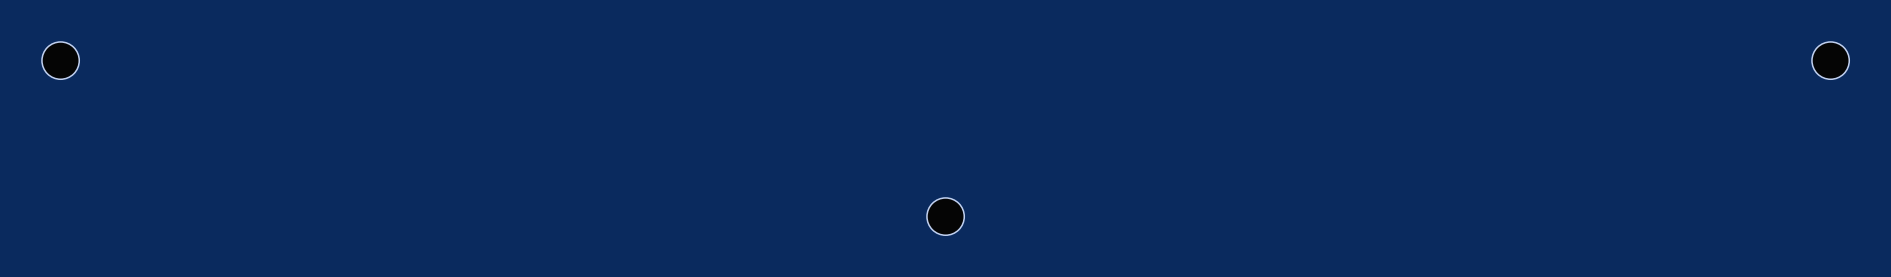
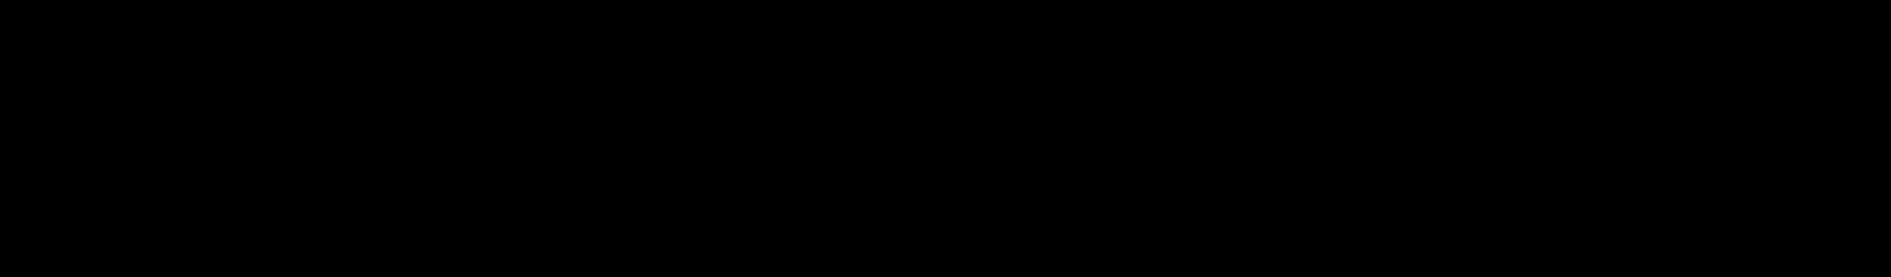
part: (60, 60) -> none
part: (1830, 60) -> none
part: (945, 216) -> none

